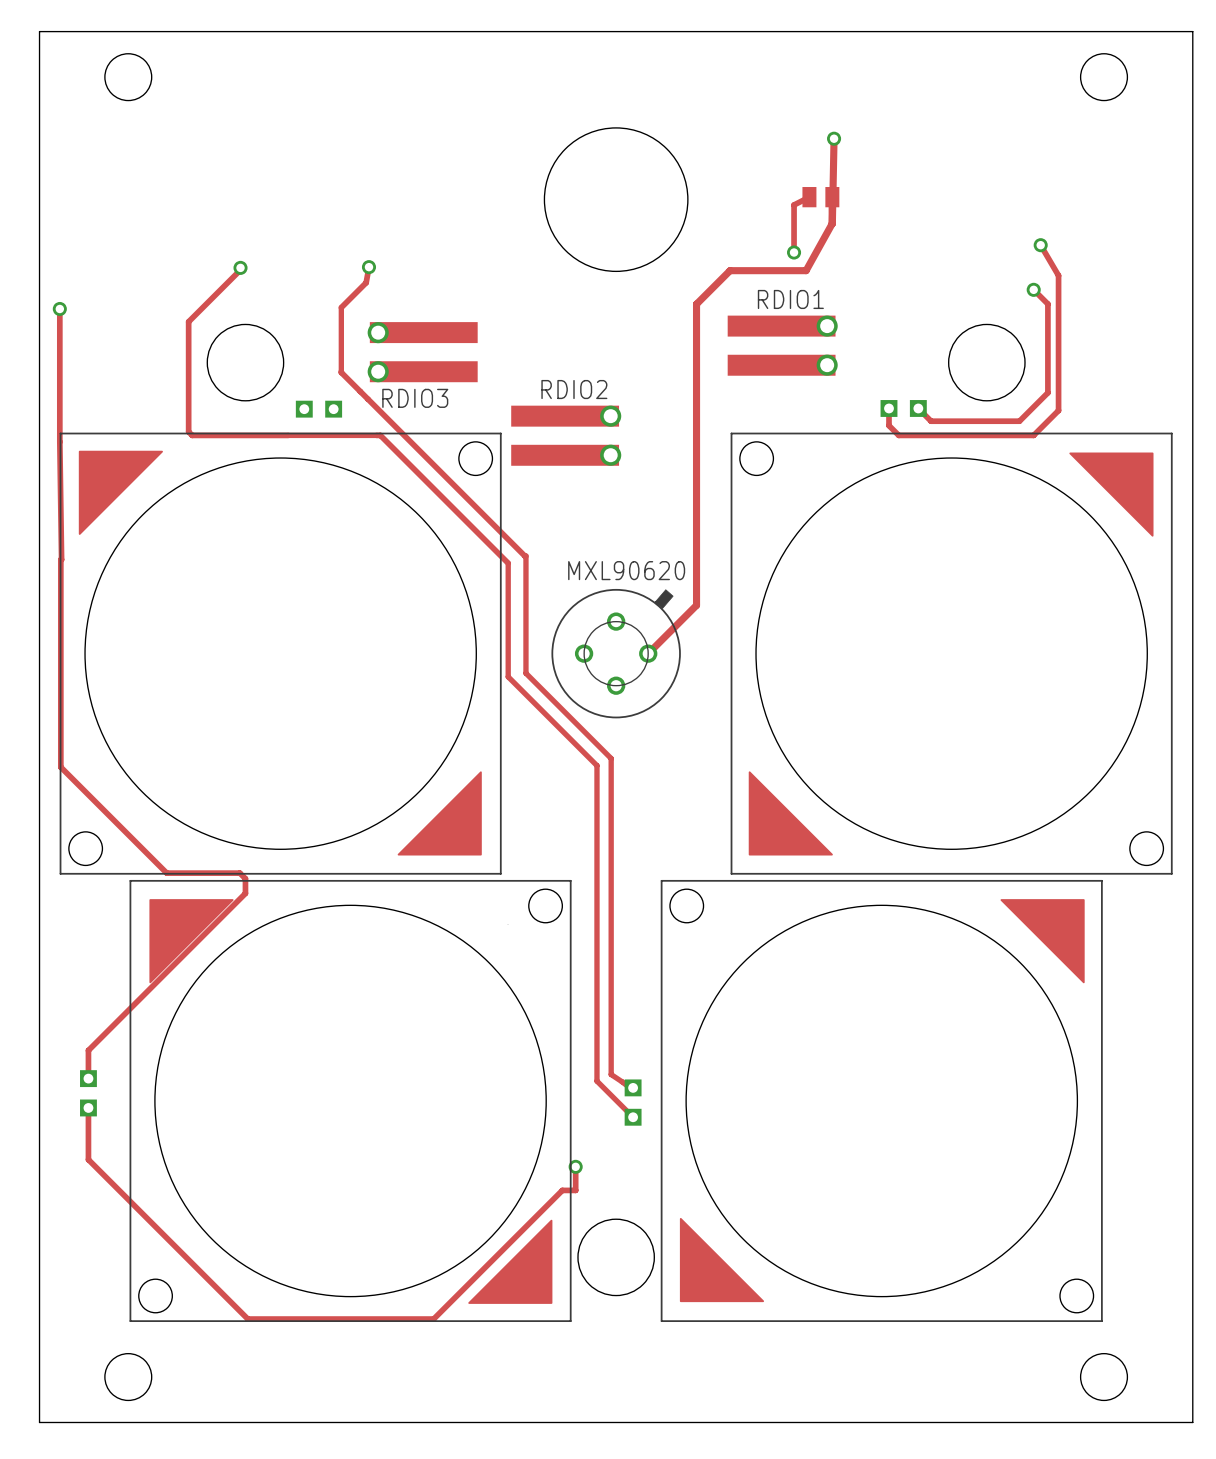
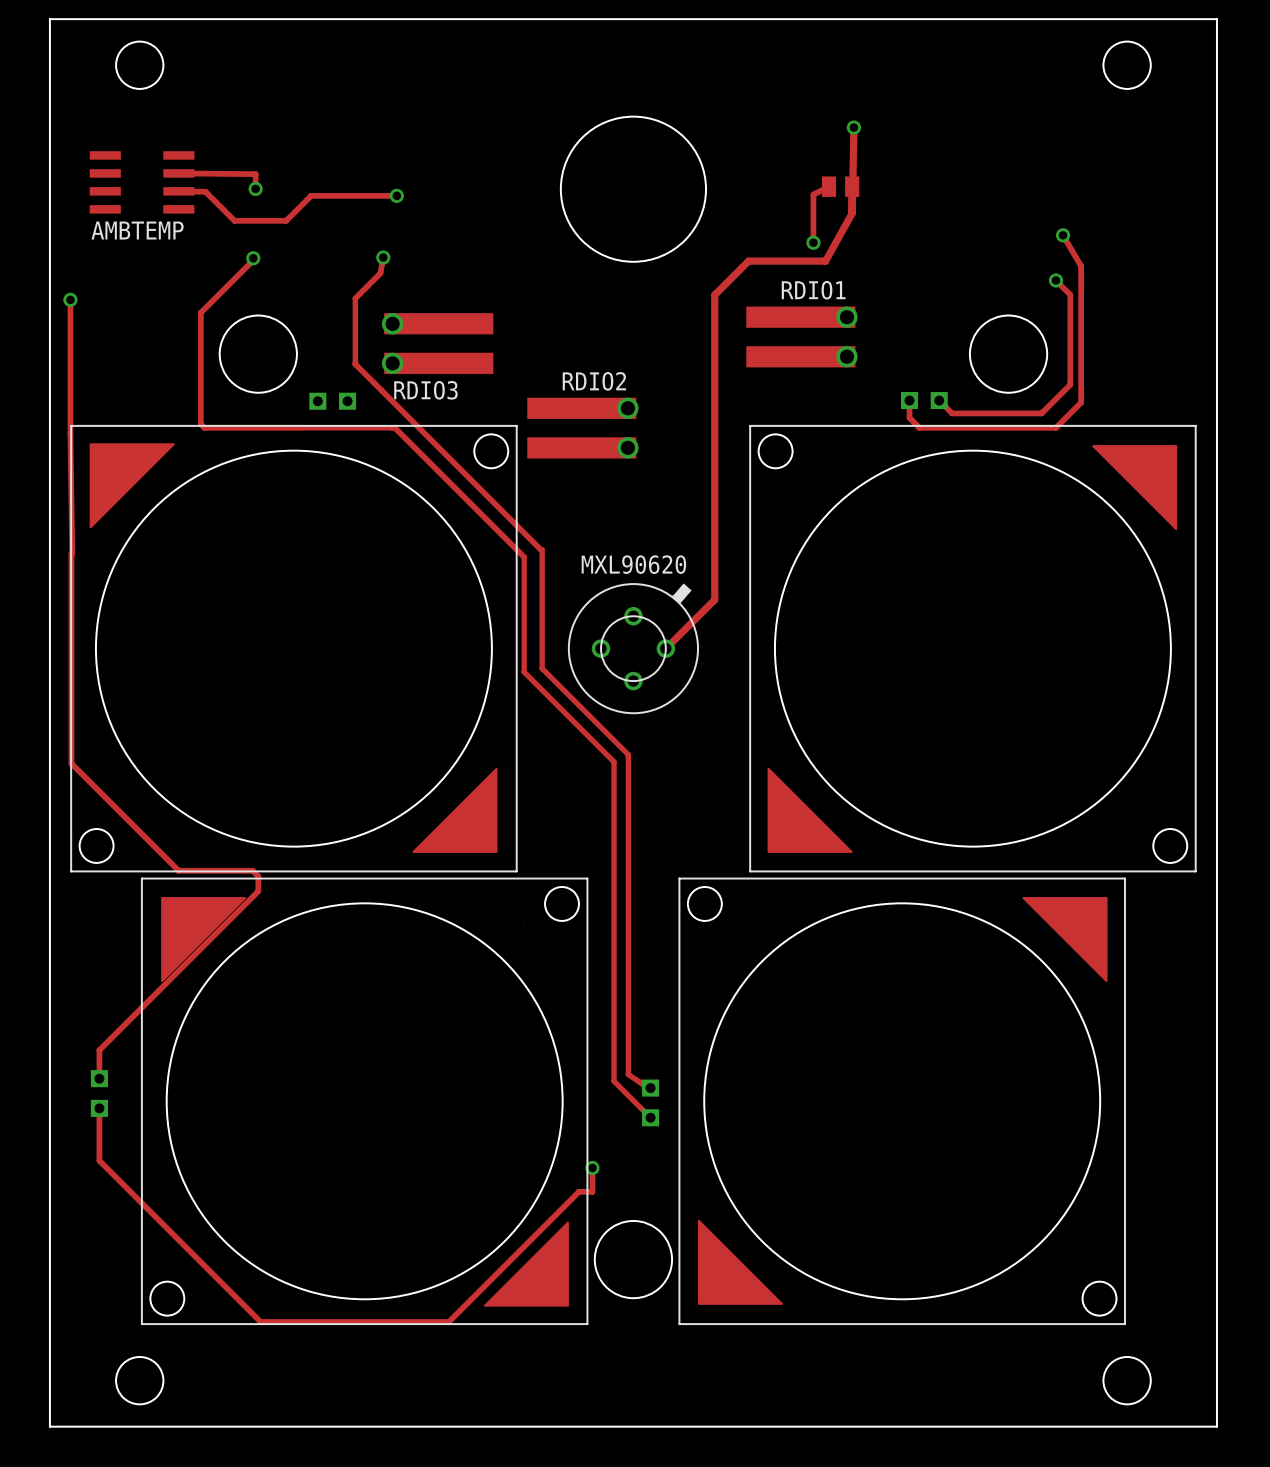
track: none -> (178, 173) (255, 174) (255, 188)
AMBTEMP: none -> (142, 182)
via: none -> (255, 188)
track: none -> (178, 191) (205, 191) (234, 220) (286, 220) (311, 195) (396, 195)
via: none -> (396, 195)

